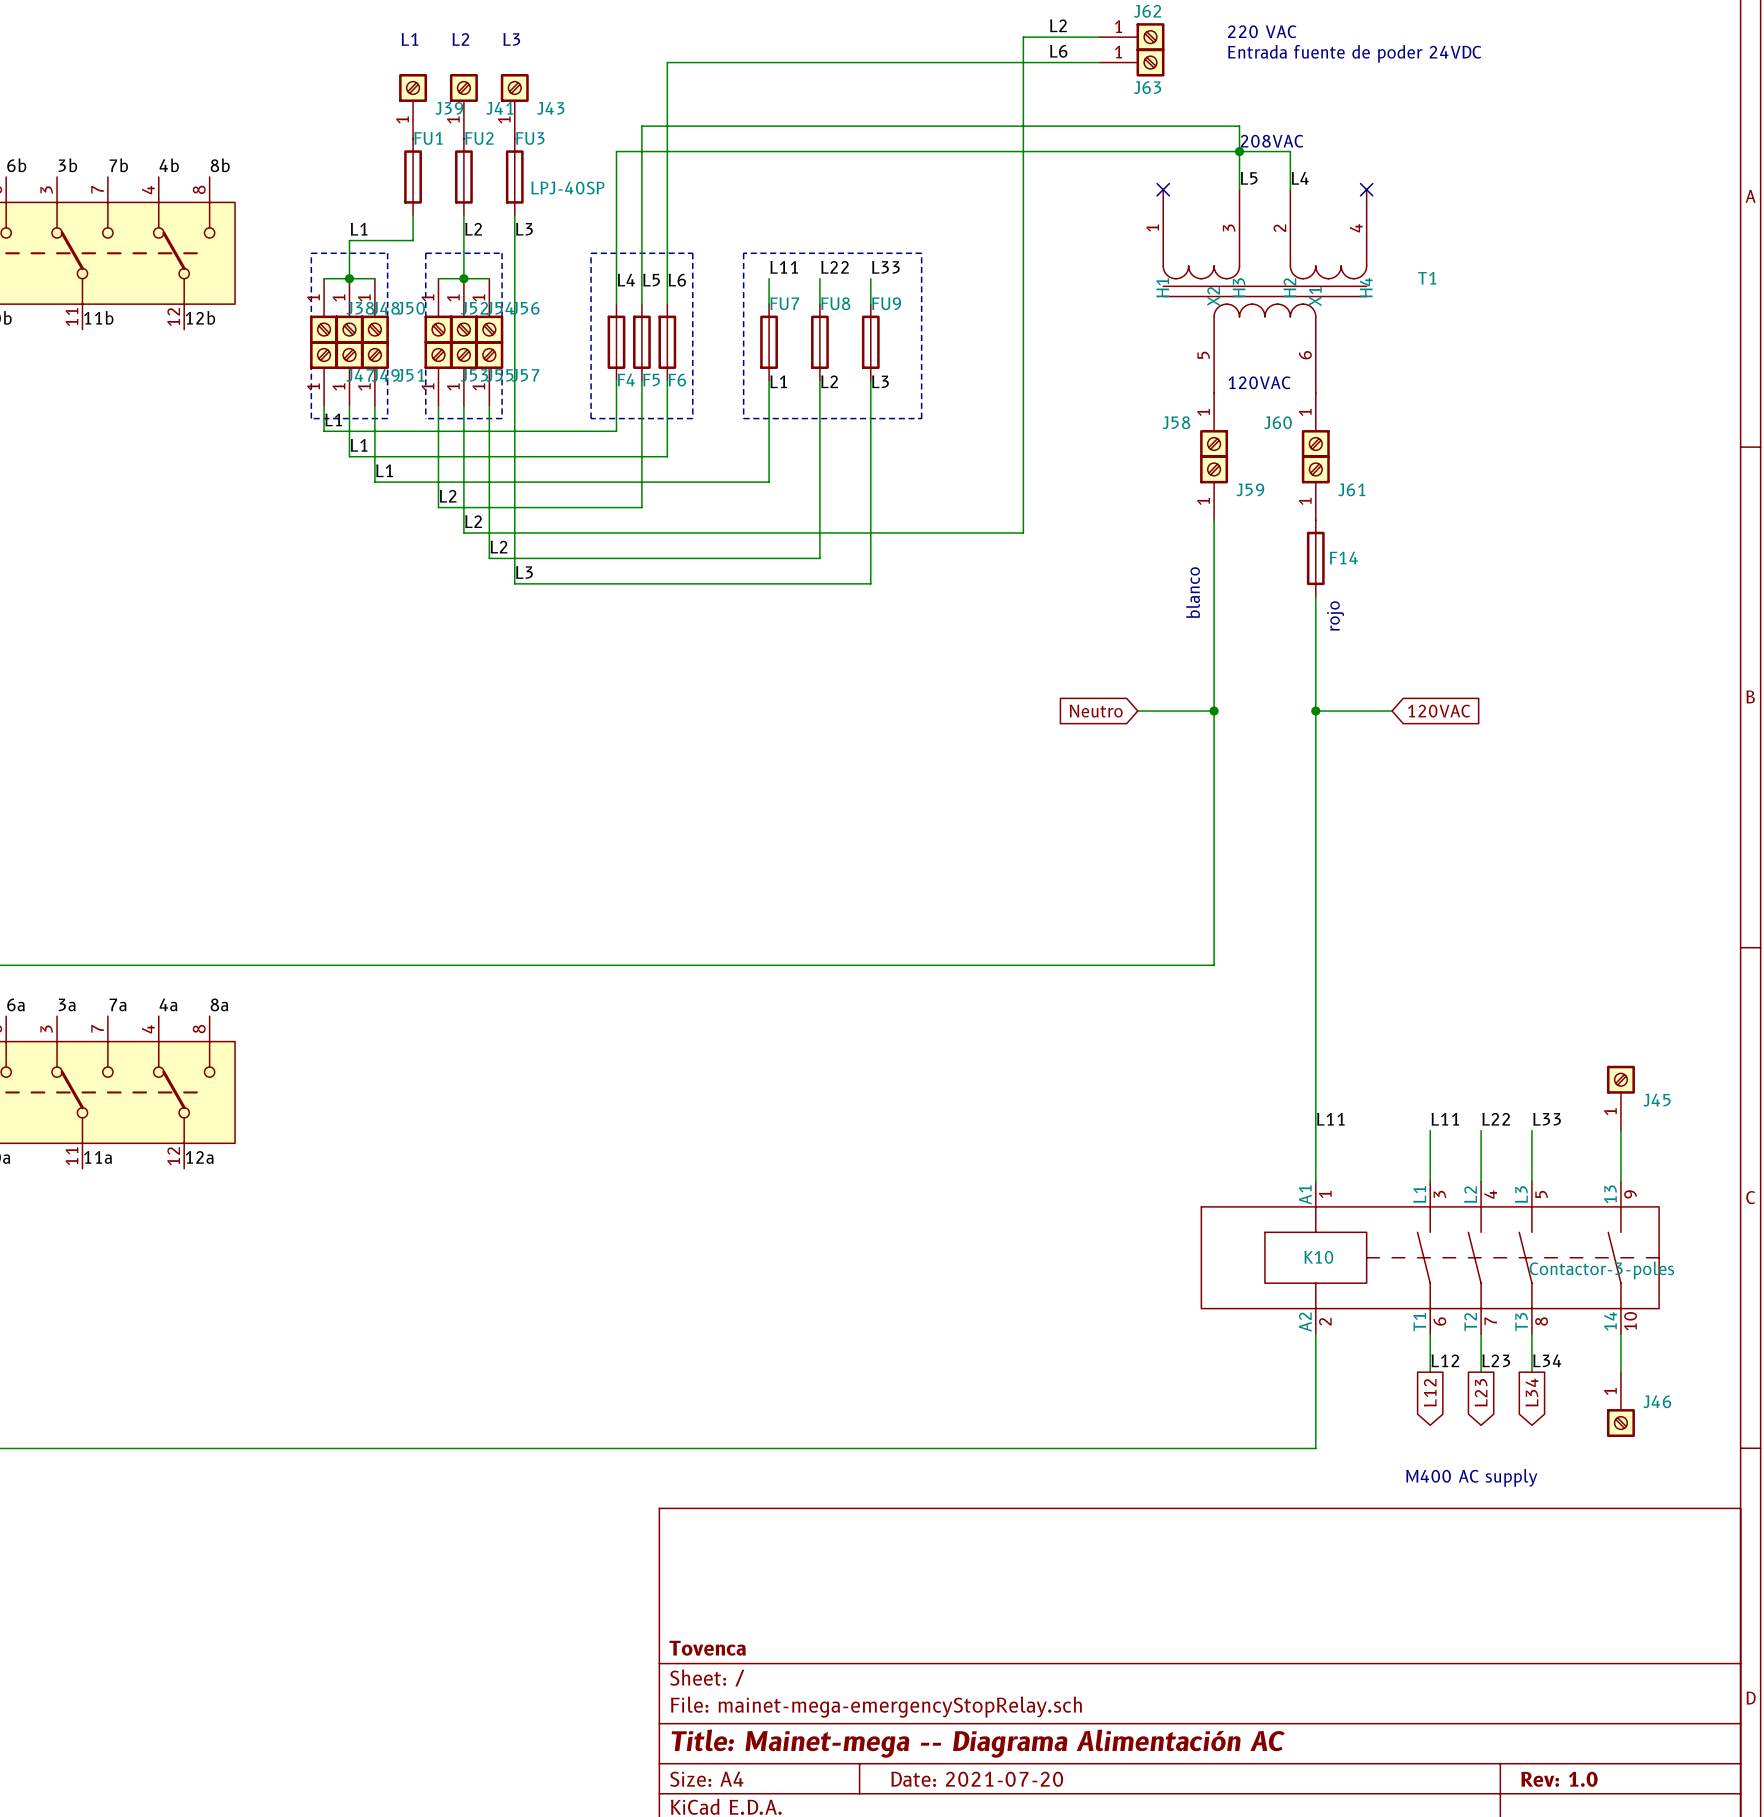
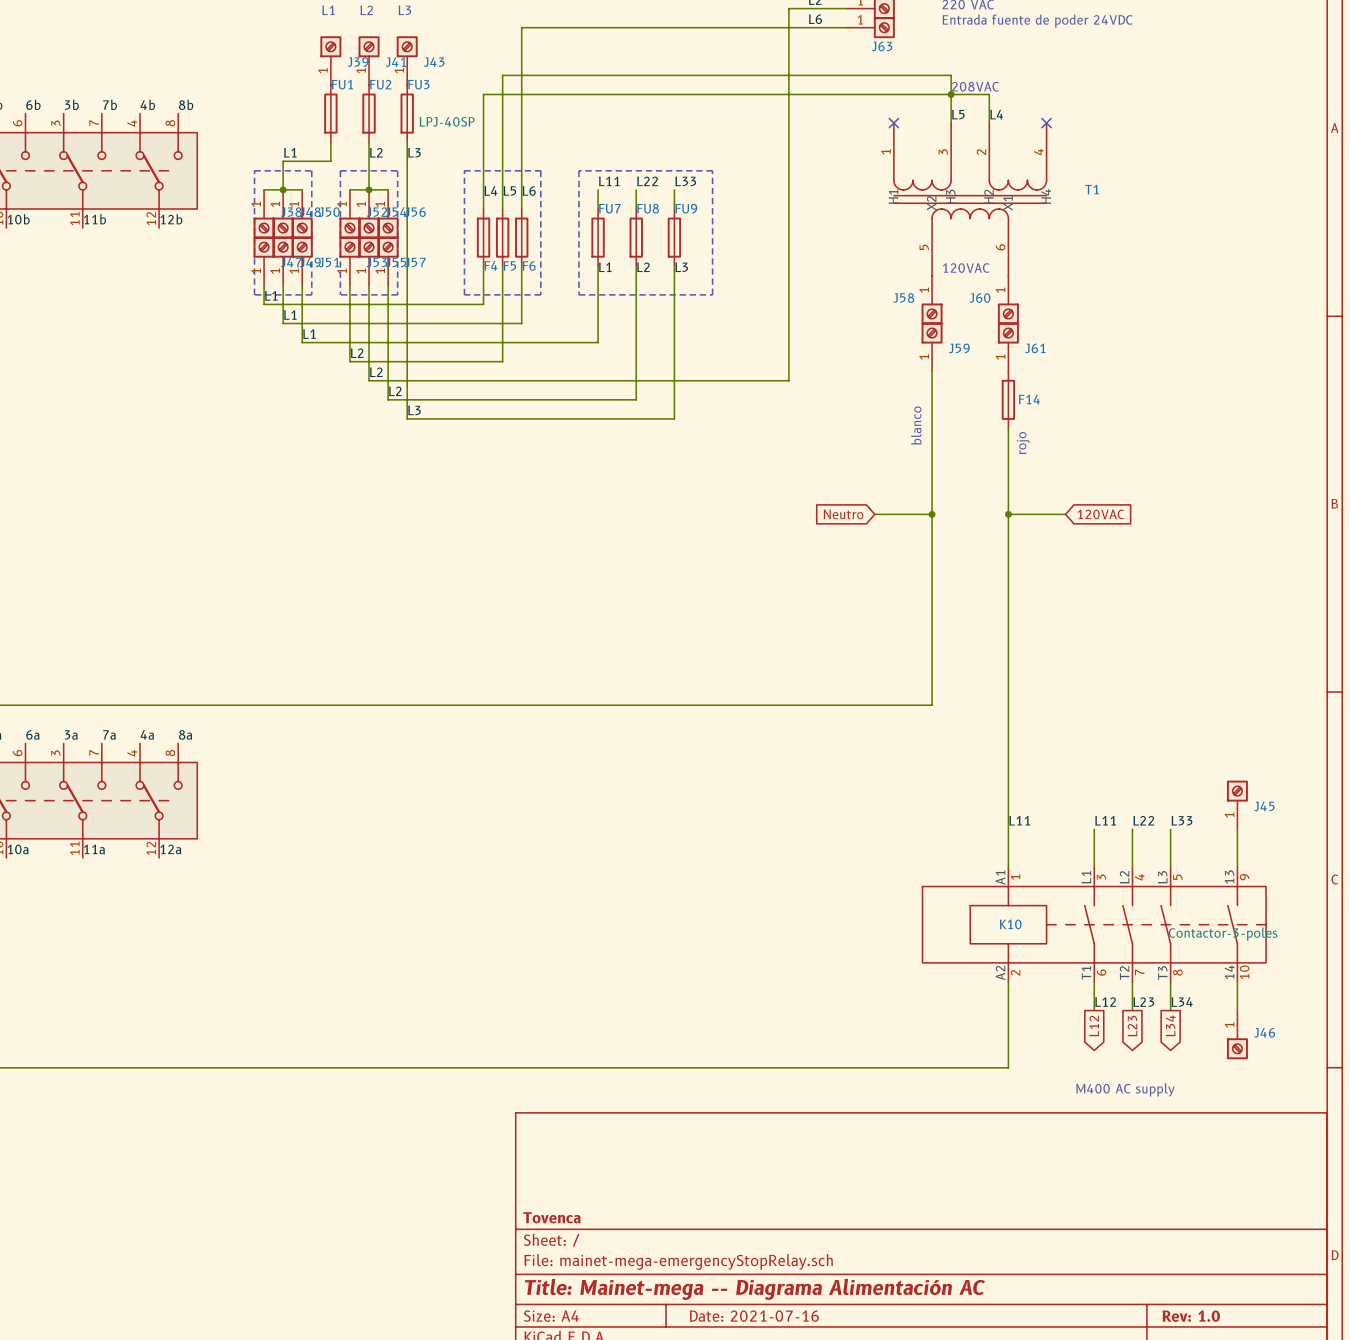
title block: Date: 2021-07-20 (977, 1779) -> Date: 2021-07-16 (754, 1316)

